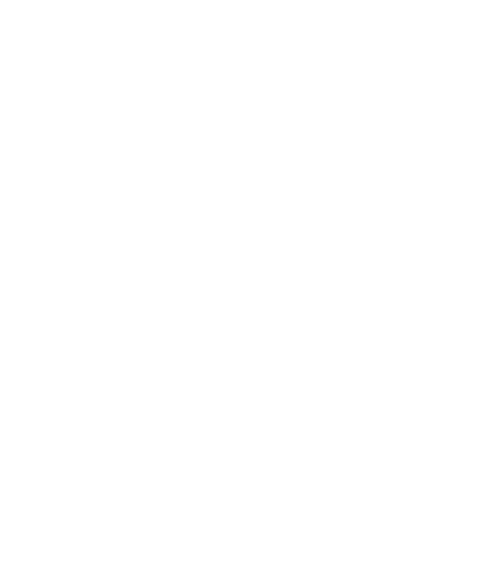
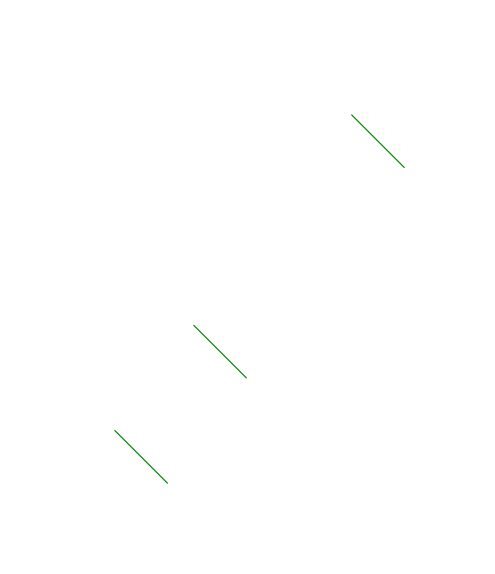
wire: none -> (351, 114) (404, 167)
wire: none -> (193, 325) (246, 377)
wire: none -> (114, 430) (167, 483)

